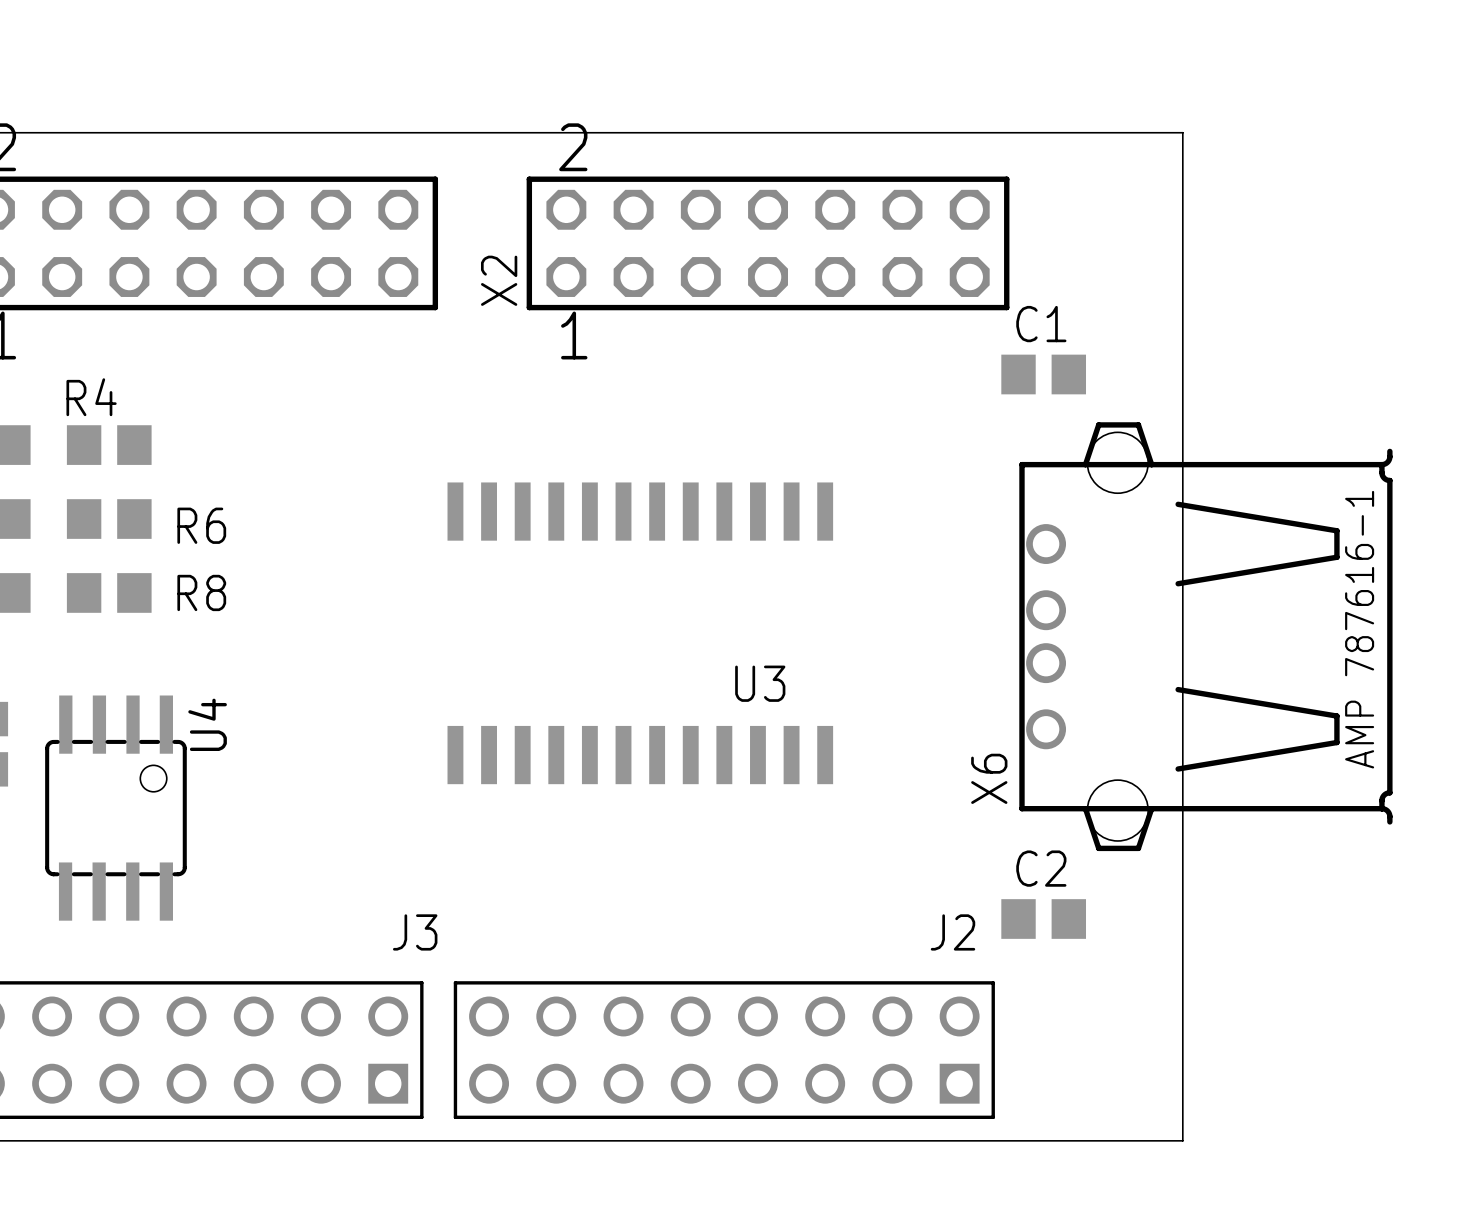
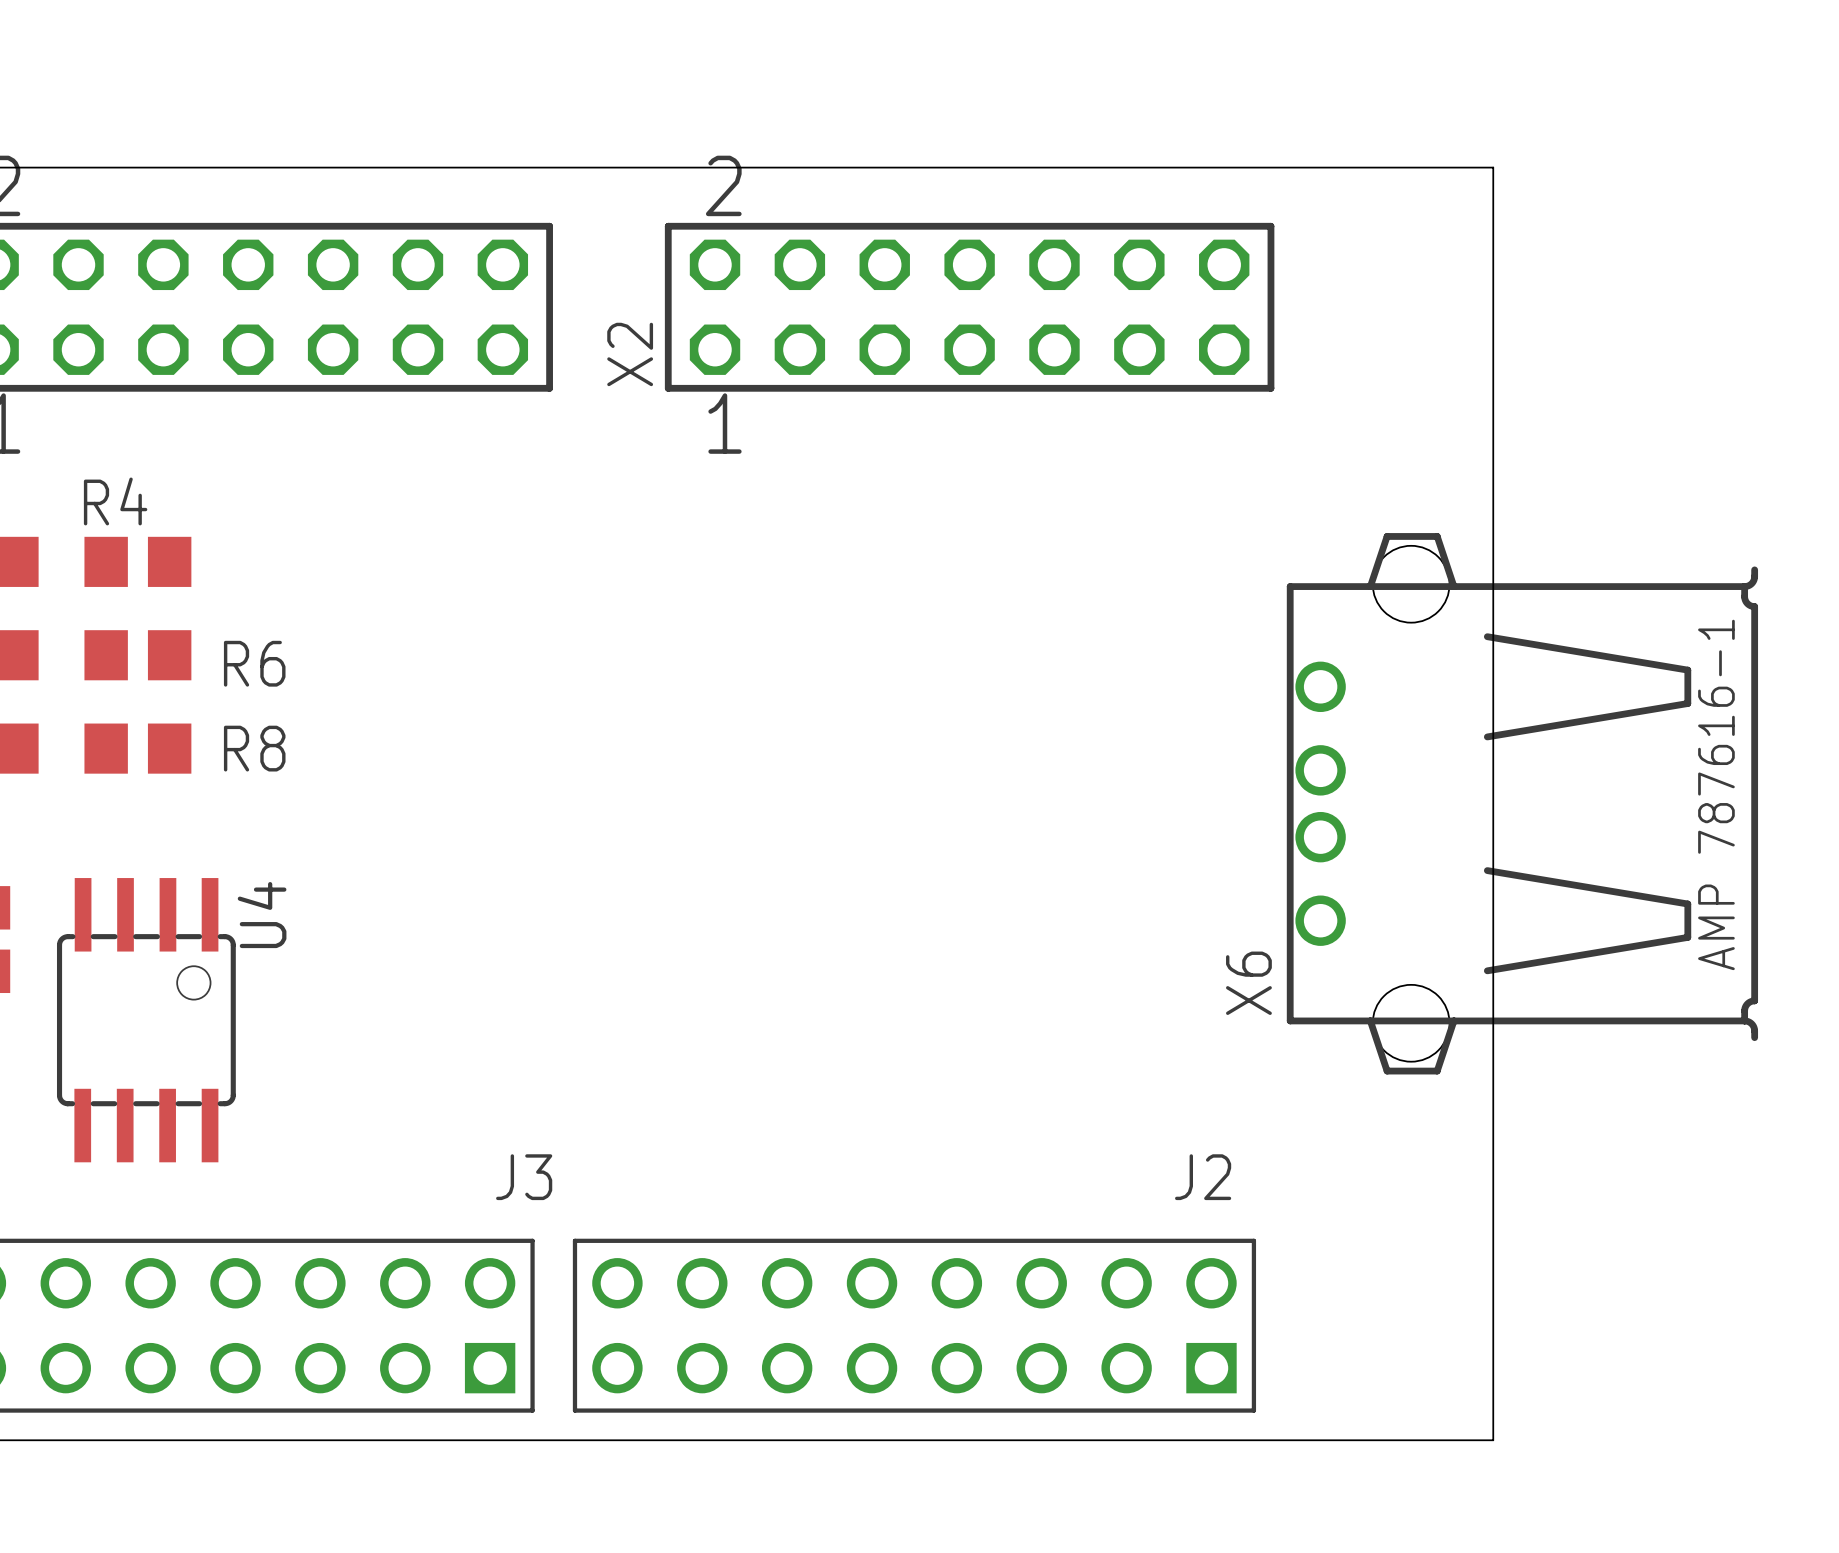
C1: (1043, 374) -> none
U3: (640, 633) -> none
C2: (1043, 919) -> none

